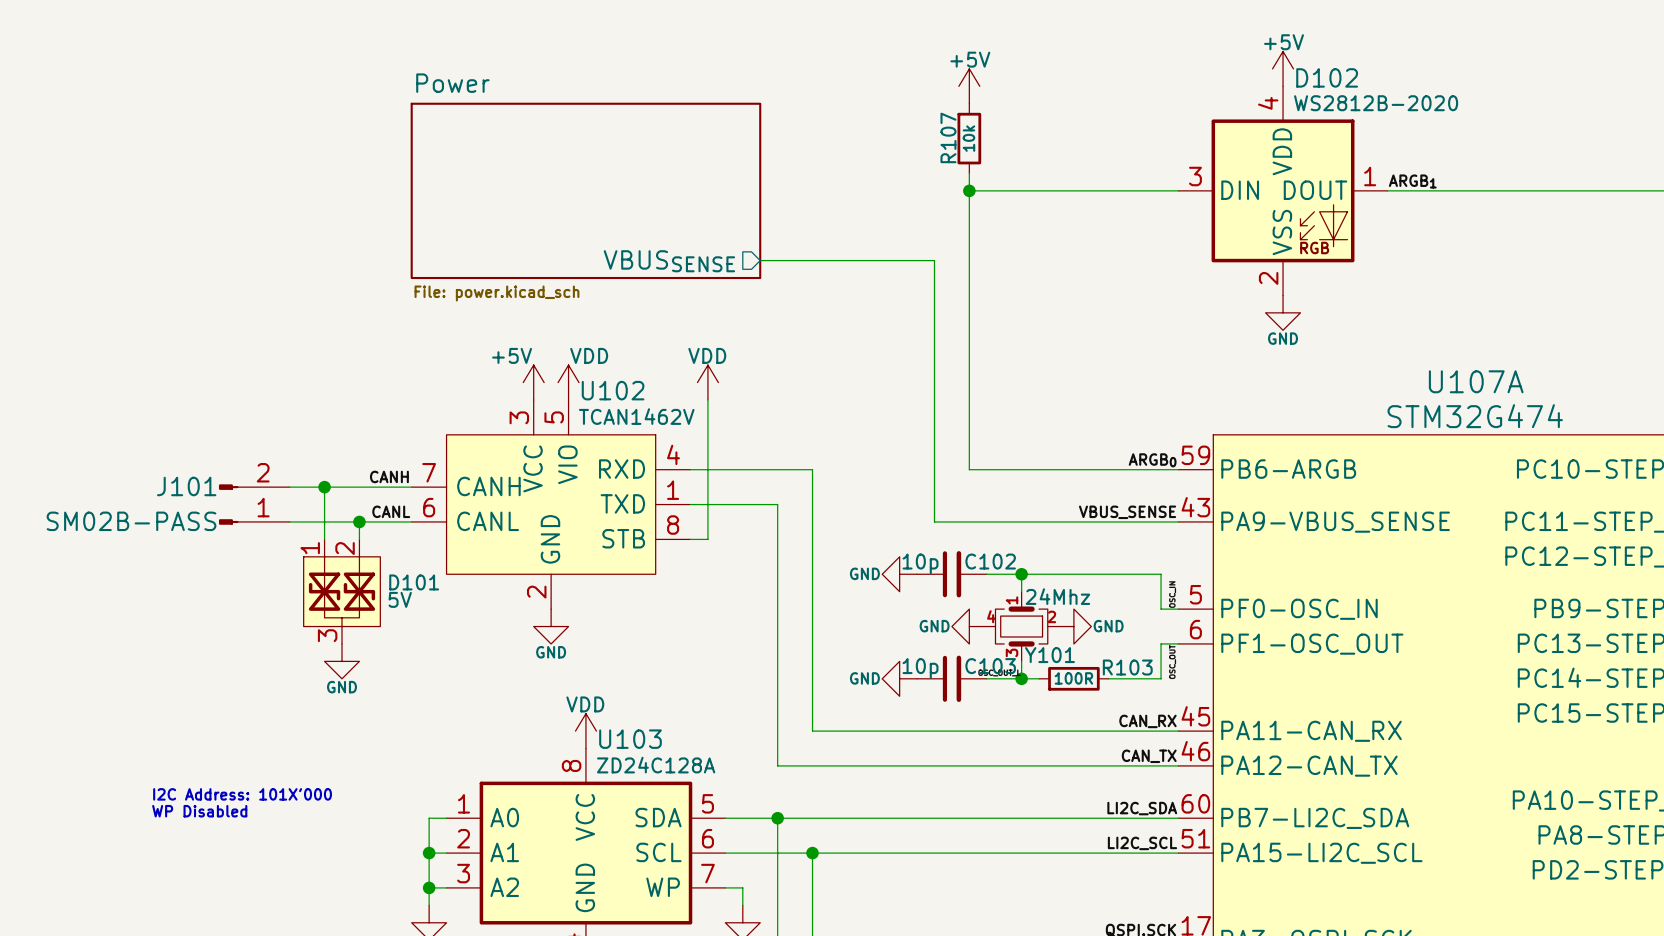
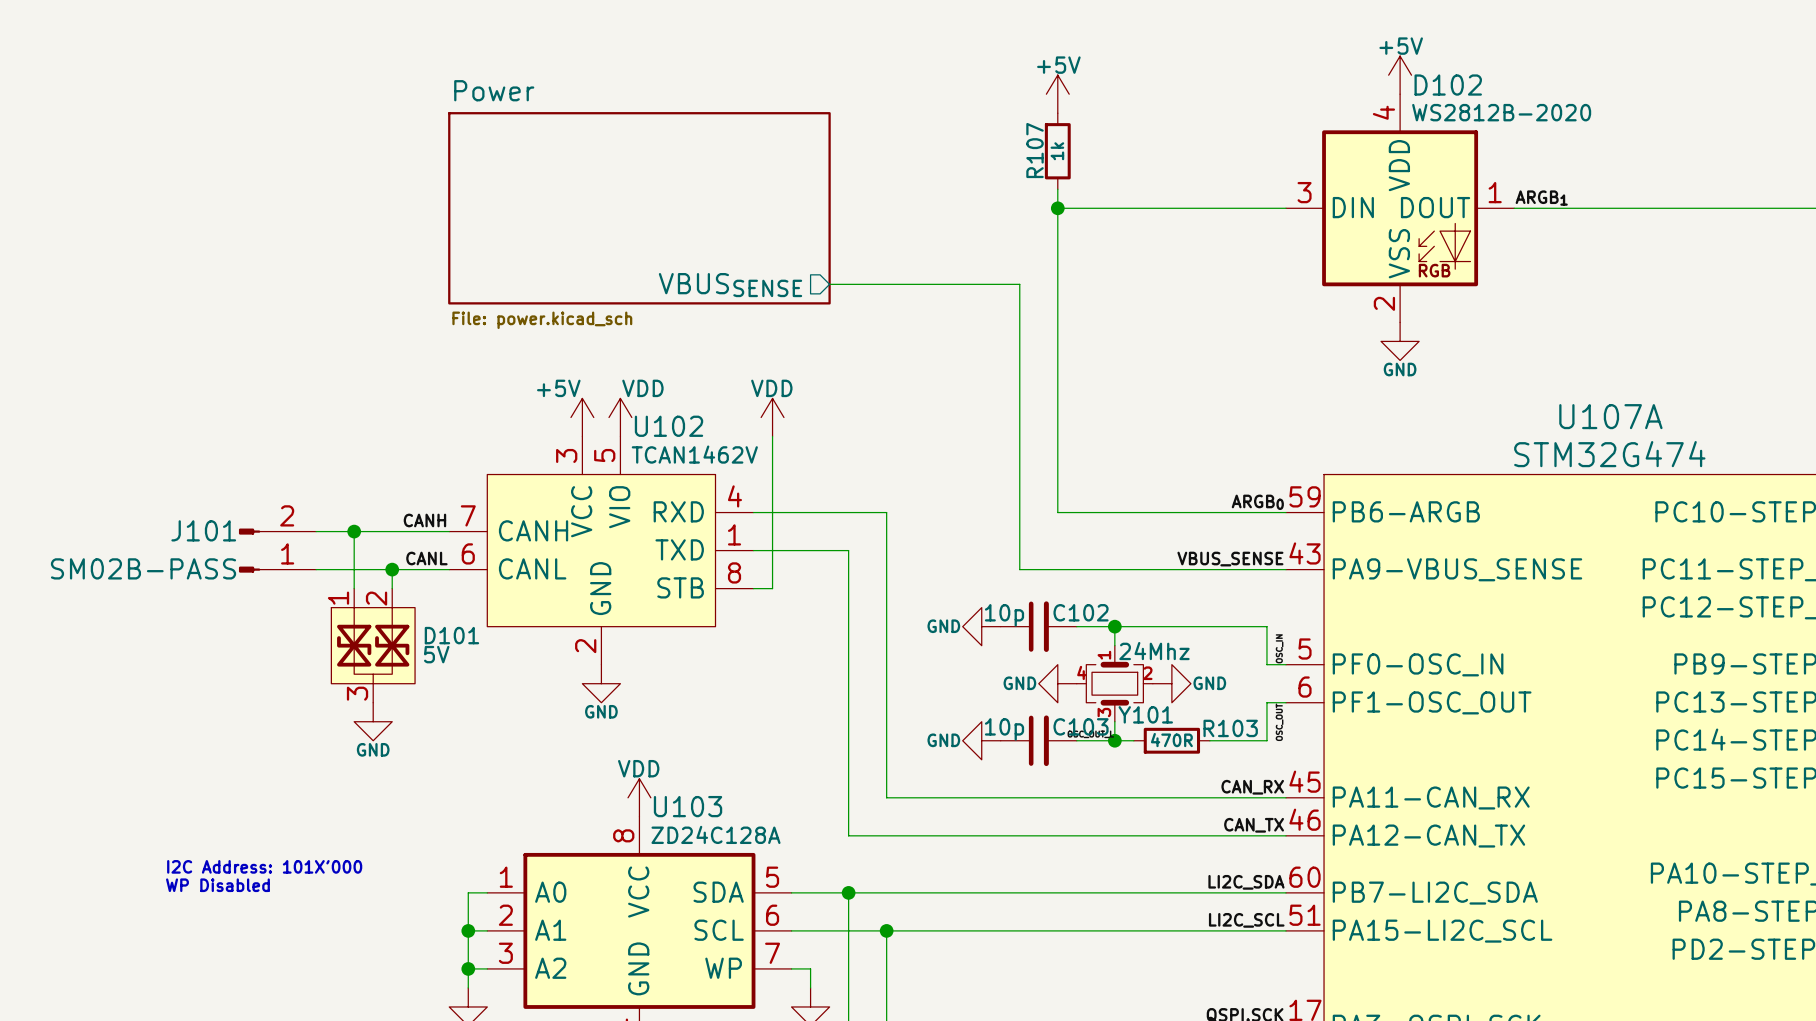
R107 value: 10k (968, 138) -> 1k (1057, 151)
R103 value: 100R (1073, 678) -> 470R (1171, 740)

